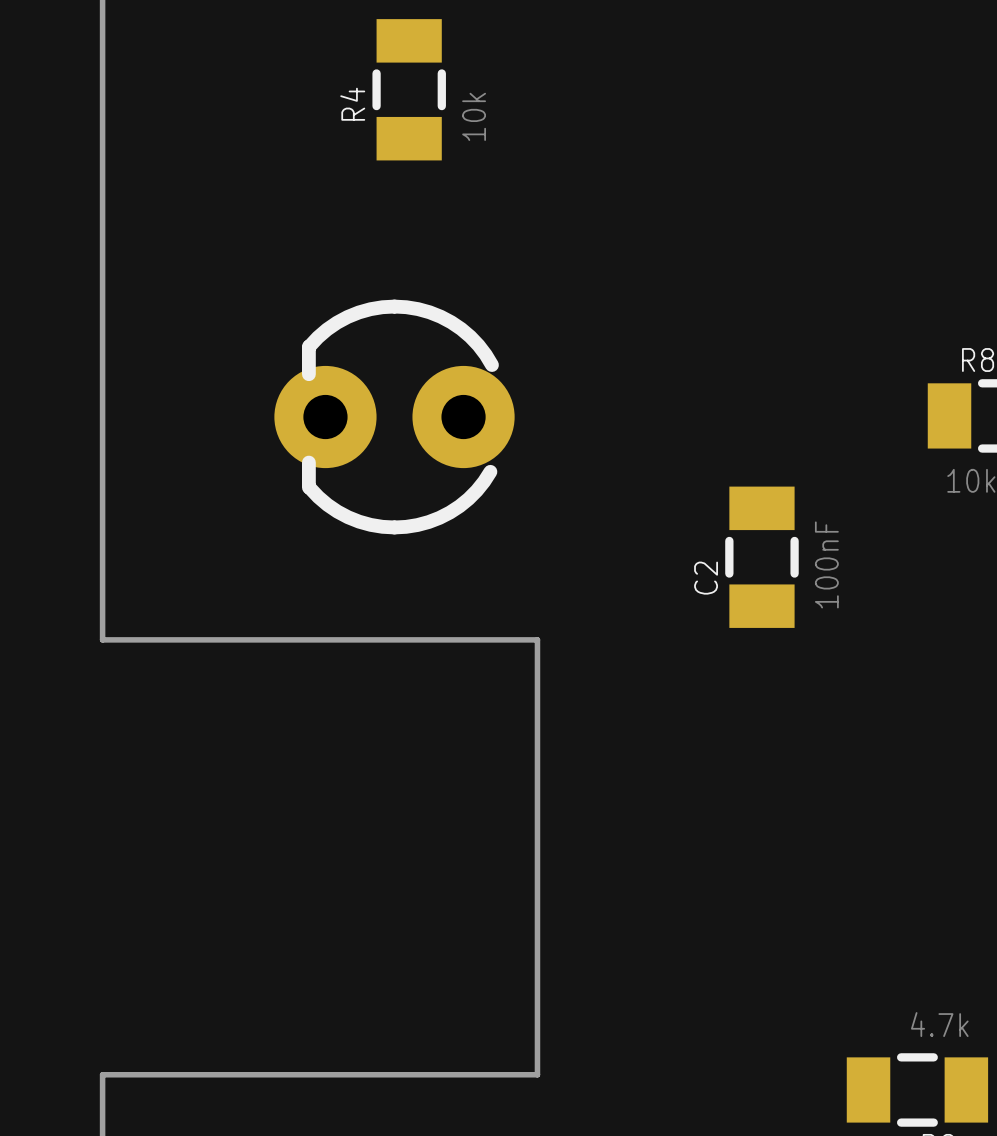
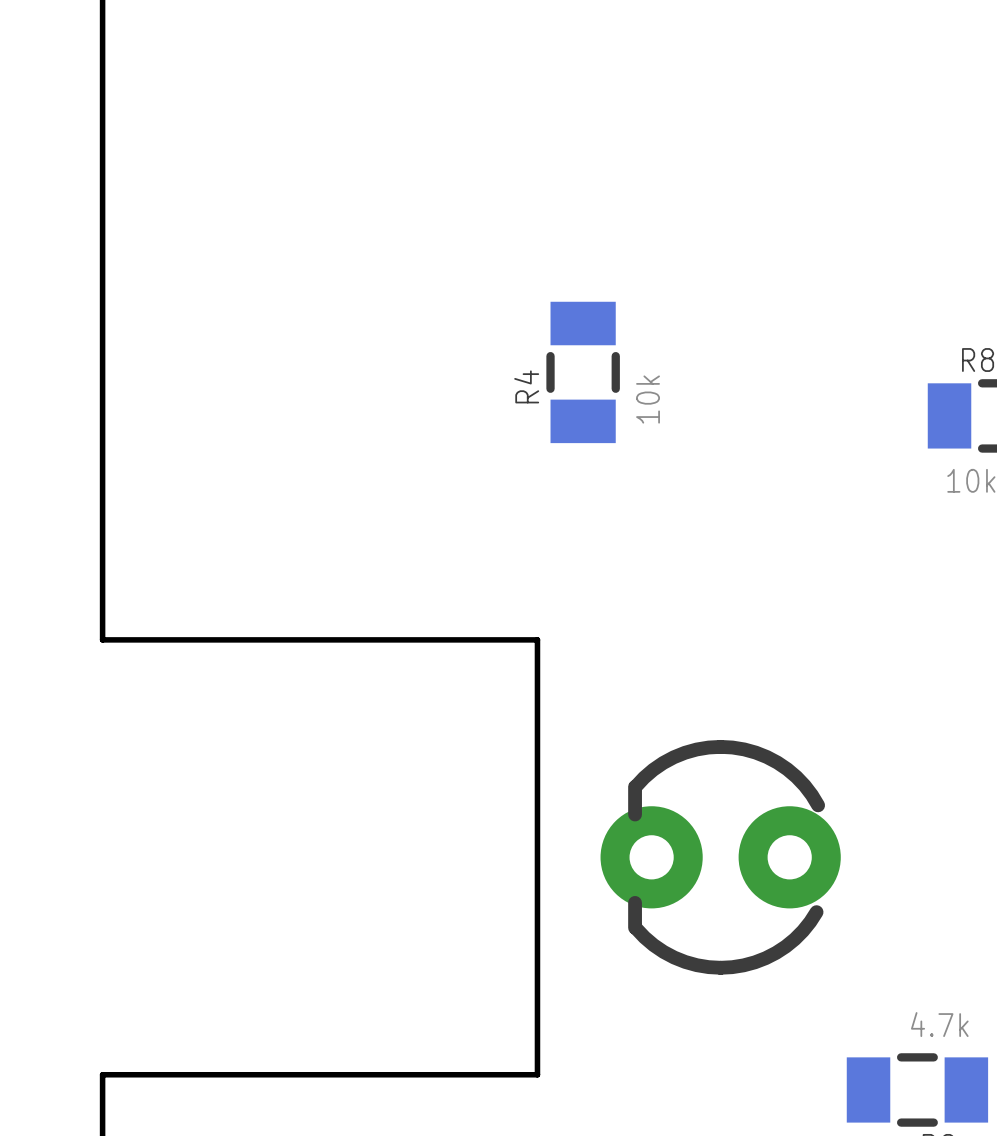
R4 position: (409, 89) -> (583, 372)
part position: (394, 417) -> (720, 857)
C2: 100nF (761, 557) -> none

